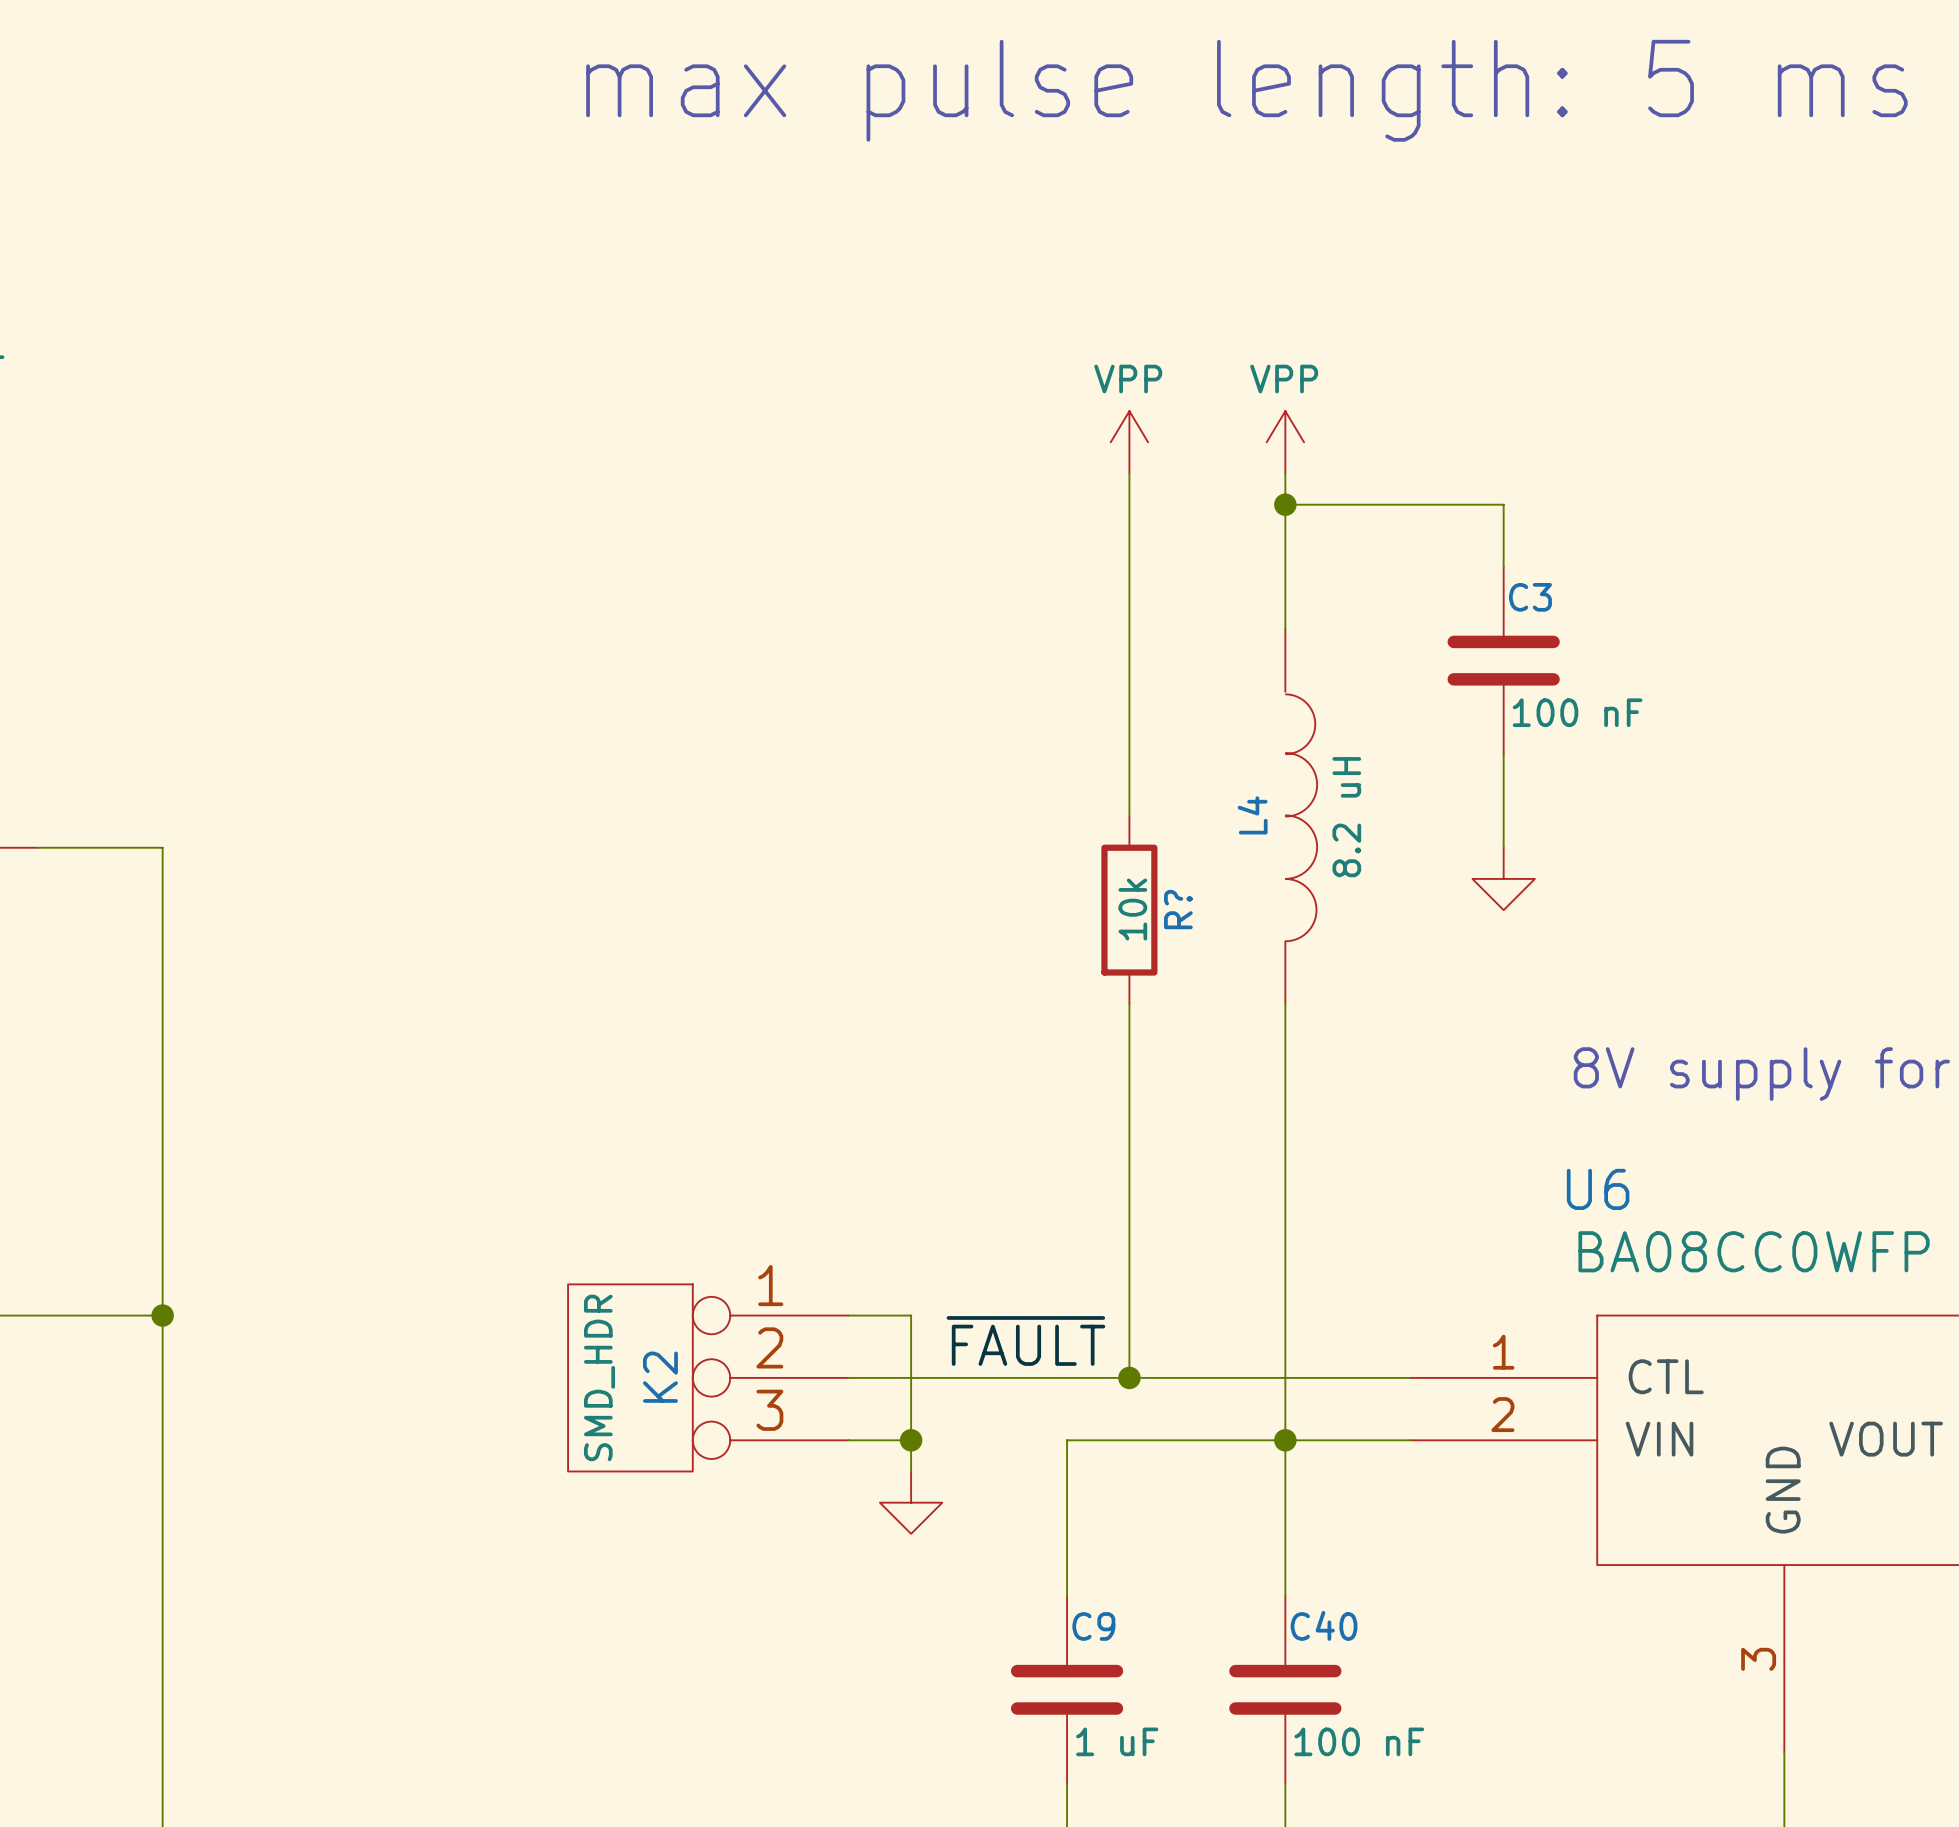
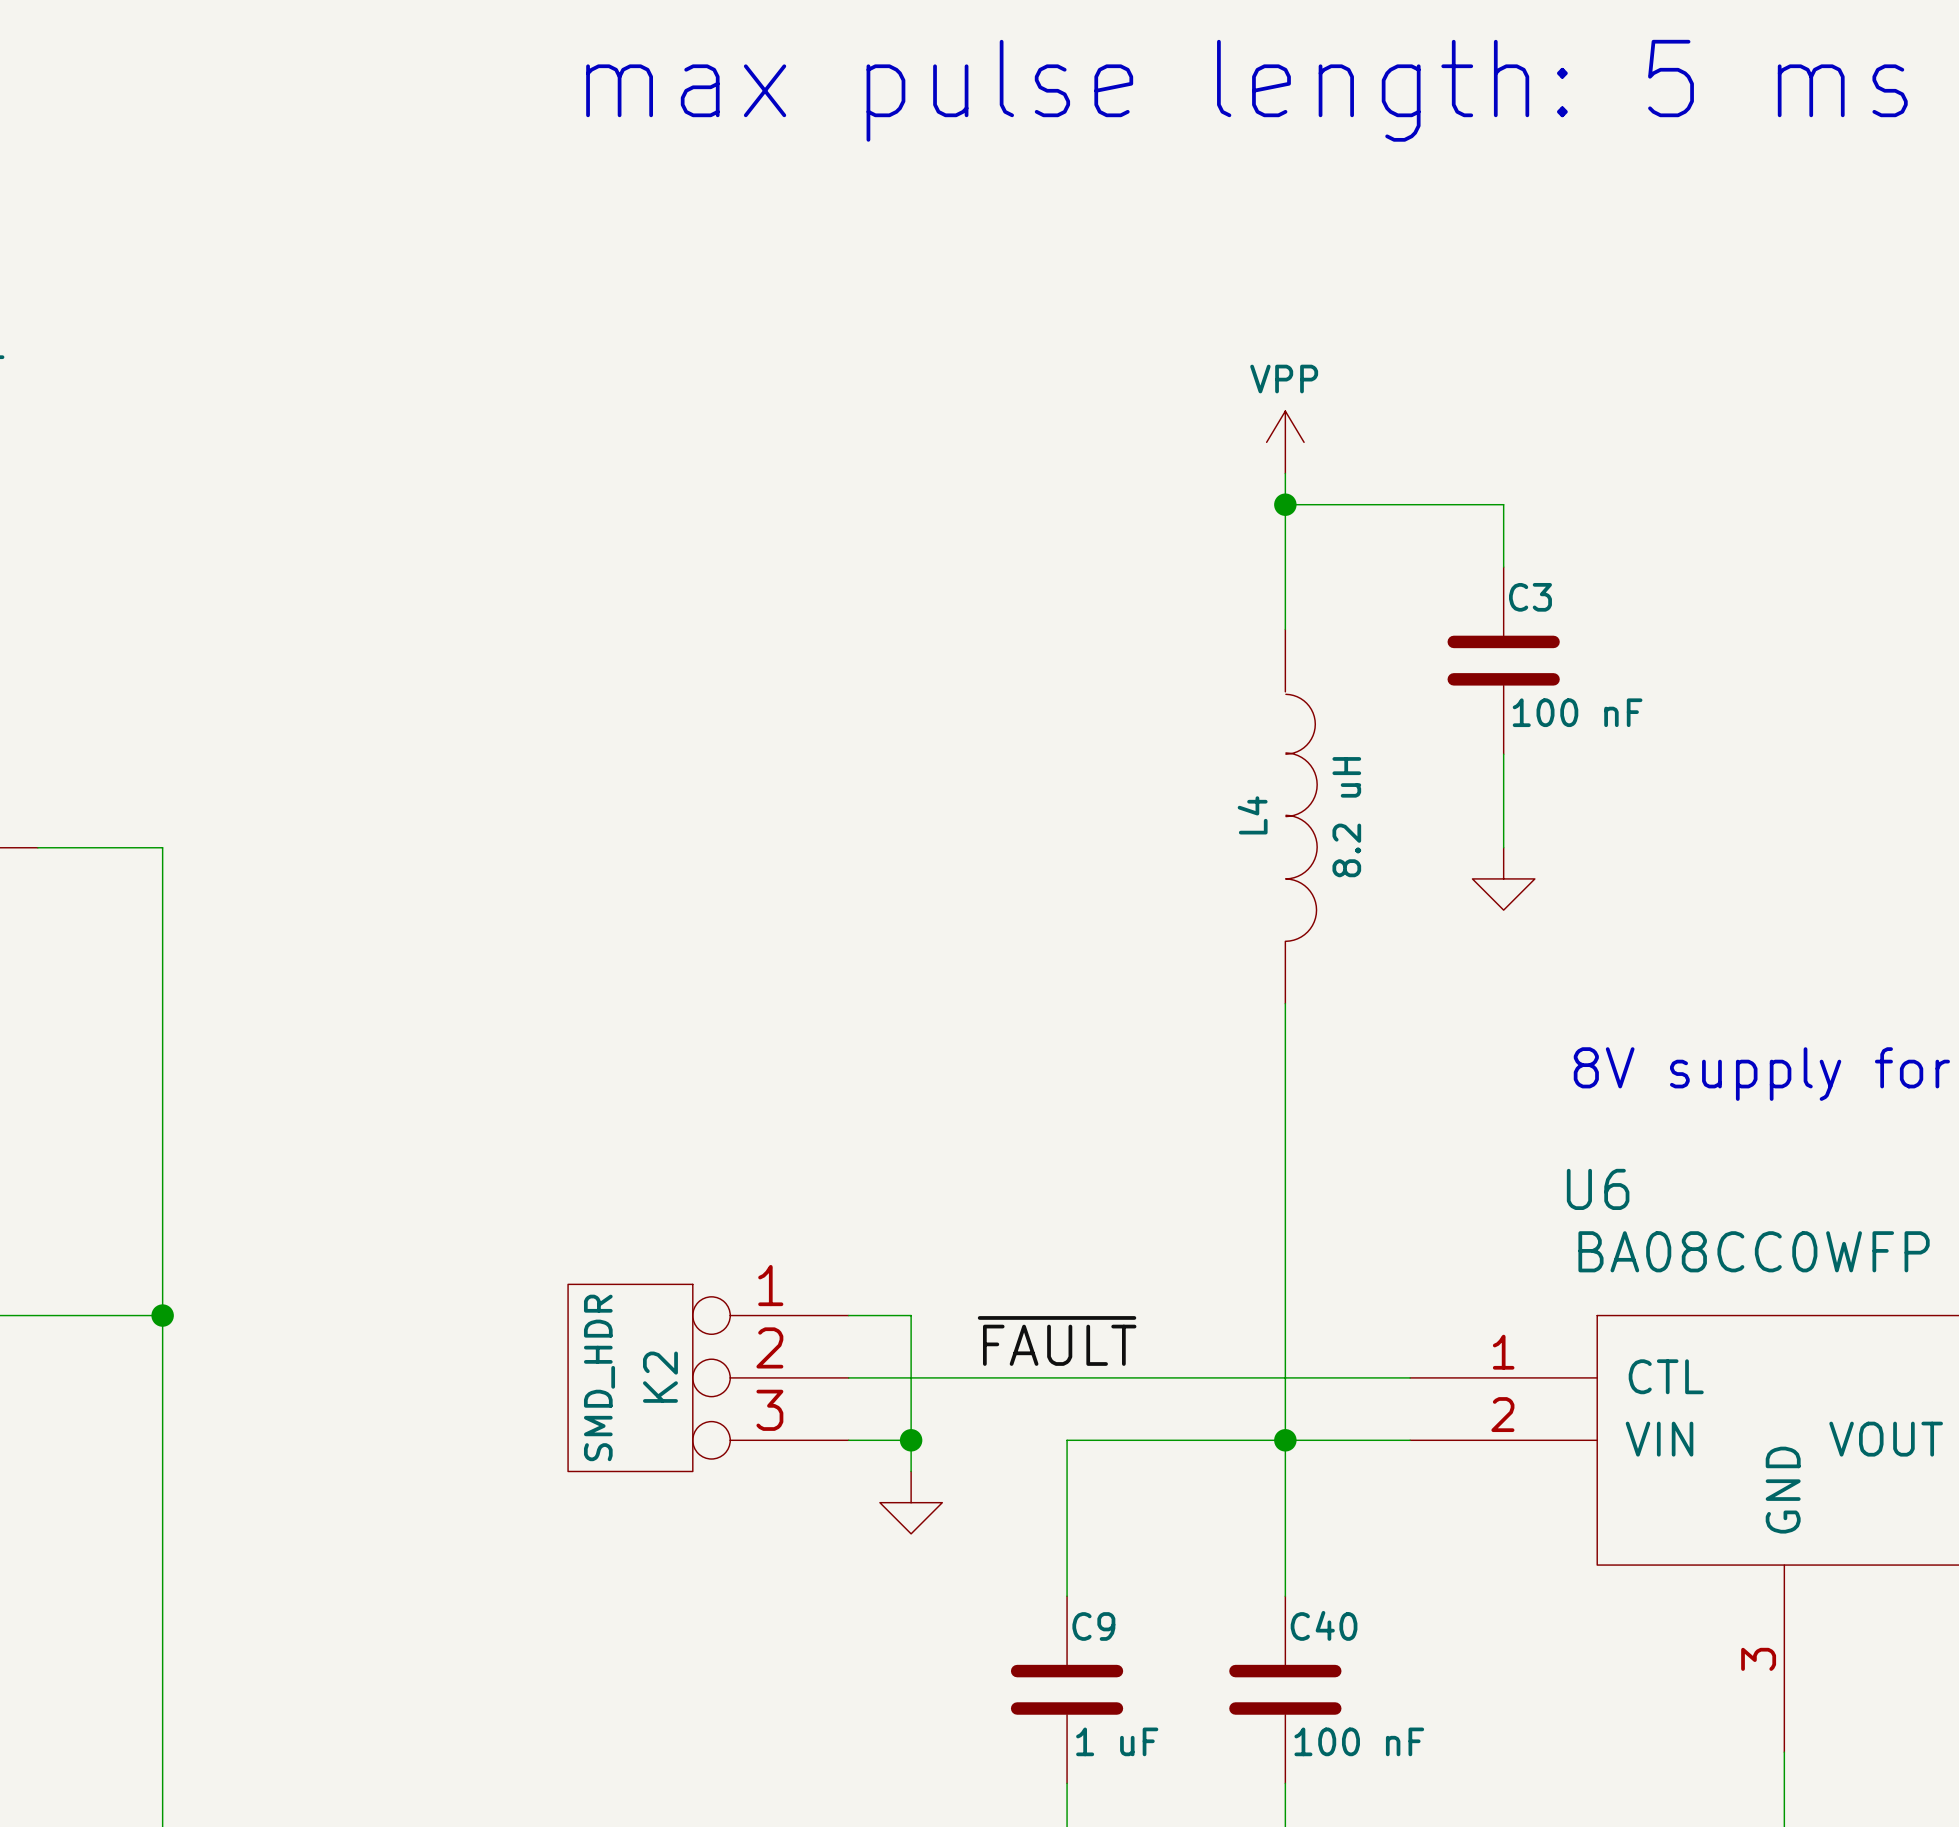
power symbol: VPP (1129, 442) -> none
wire: (1129, 473) (1129, 816) -> none
R?: 10k (1129, 910) -> none
wire: (1129, 1003) (1129, 1377) -> none
label position: ~{FAULT} (1025, 1340) -> ~{FAULT} (1057, 1340)
junction: (1129, 1377) -> none

